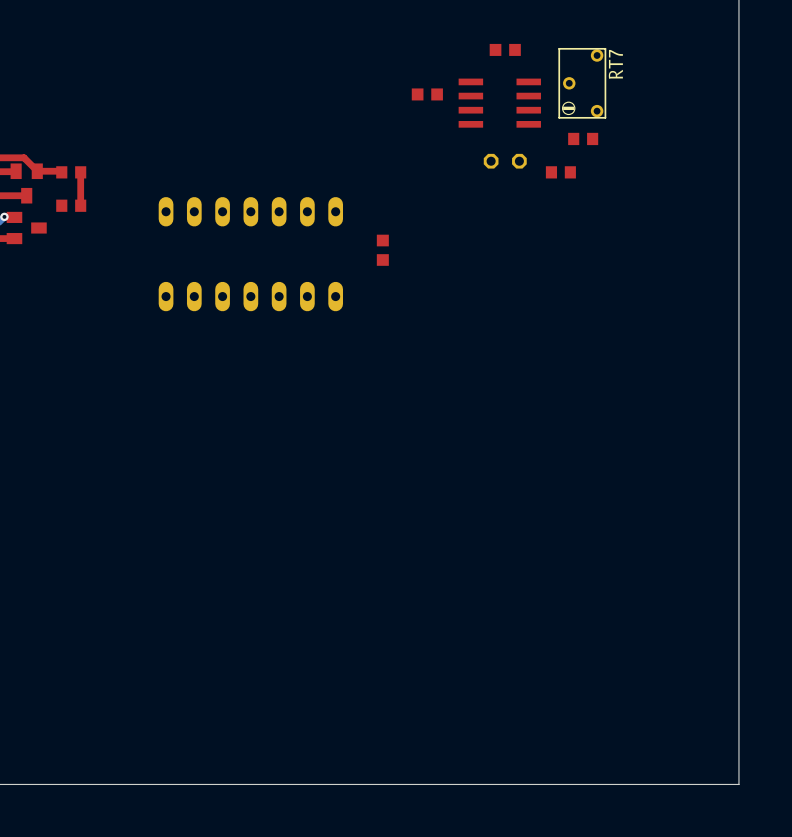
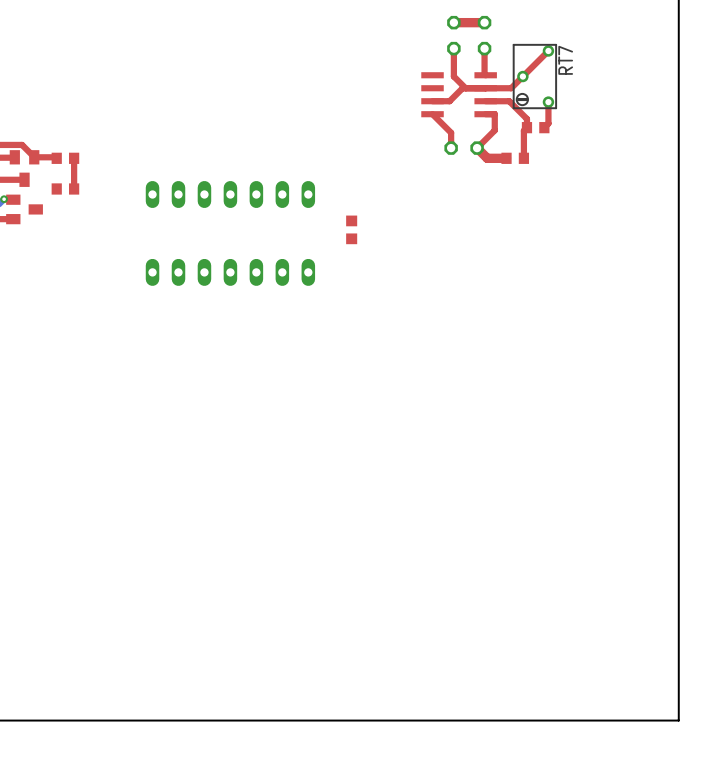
top track: none -> (484, 22) (453, 22)
part: none -> (453, 35)
part: none -> (484, 35)
part: (505, 49) -> none
top track: none -> (453, 48) (453, 76) (465, 88)
top track: none -> (484, 48) (485, 75)
top track: none -> (548, 50) (511, 88) (462, 88) (449, 101) (432, 101)
part: (427, 94) -> none
top track: none -> (485, 101) (509, 101) (526, 118) (526, 127) (523, 130) (523, 158)
top track: none -> (548, 102) (548, 123) (544, 127)
top track: none -> (432, 114) (451, 132) (451, 148)
top track: none -> (485, 114) (494, 114) (494, 130) (477, 148) (487, 158) (506, 158)

